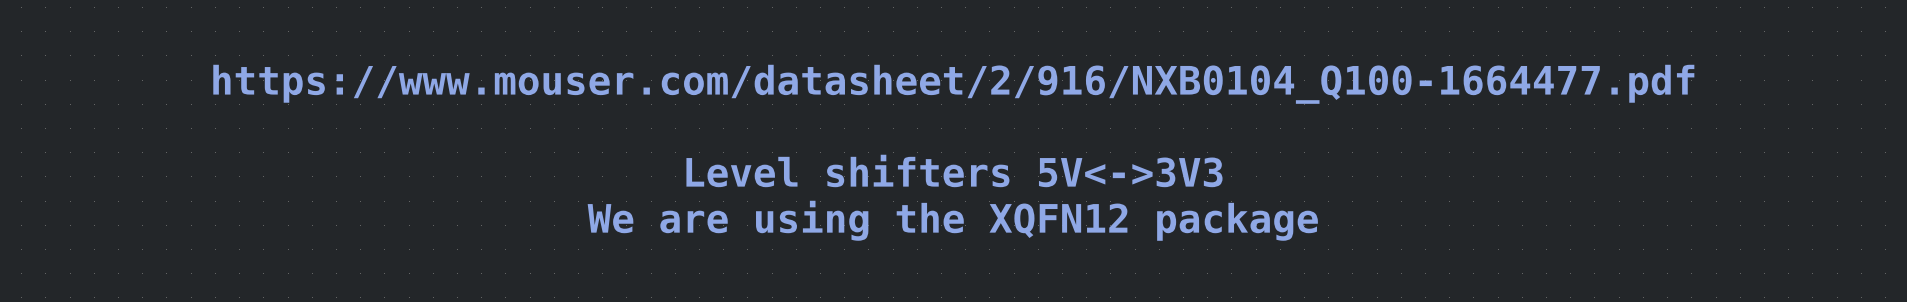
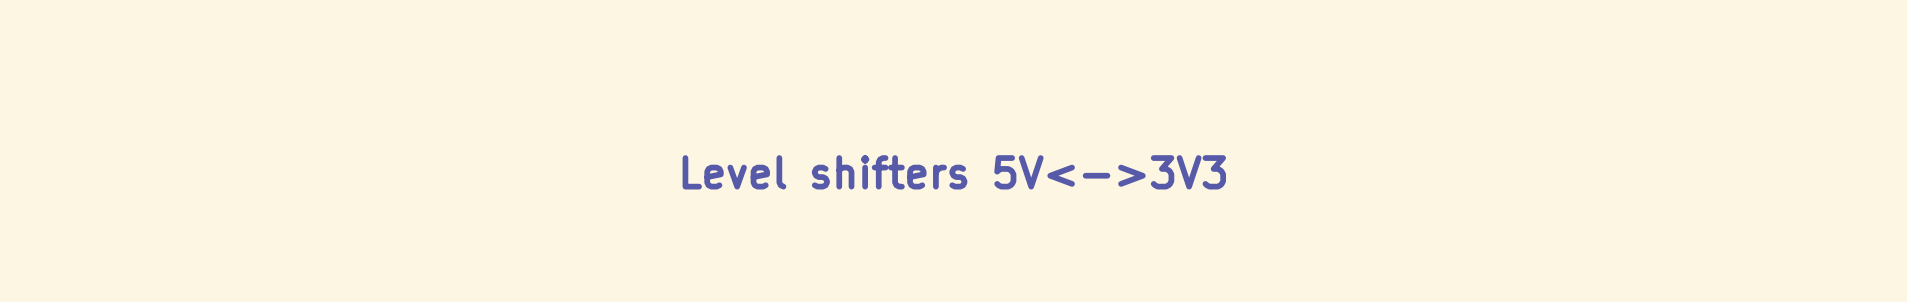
text: https://www.mouser.com/datasheet/2/916/NXB0104_Q100-1664477.pdf (953, 84) -> none
text: We are using the XQFN12 package (952, 220) -> none

